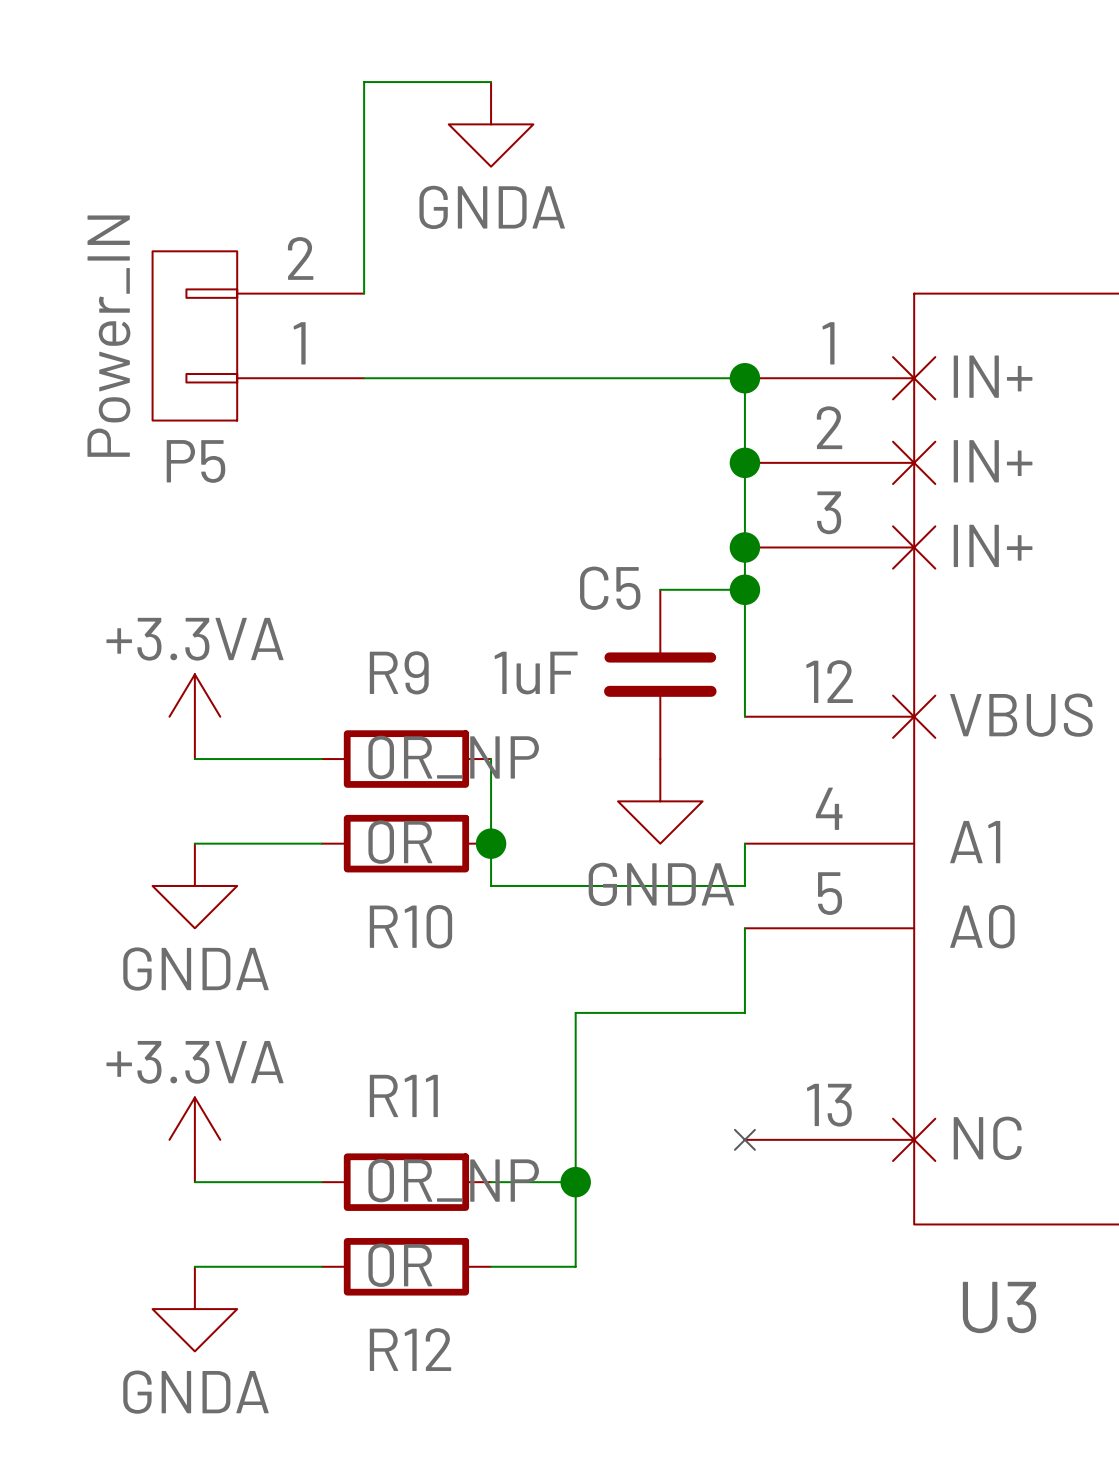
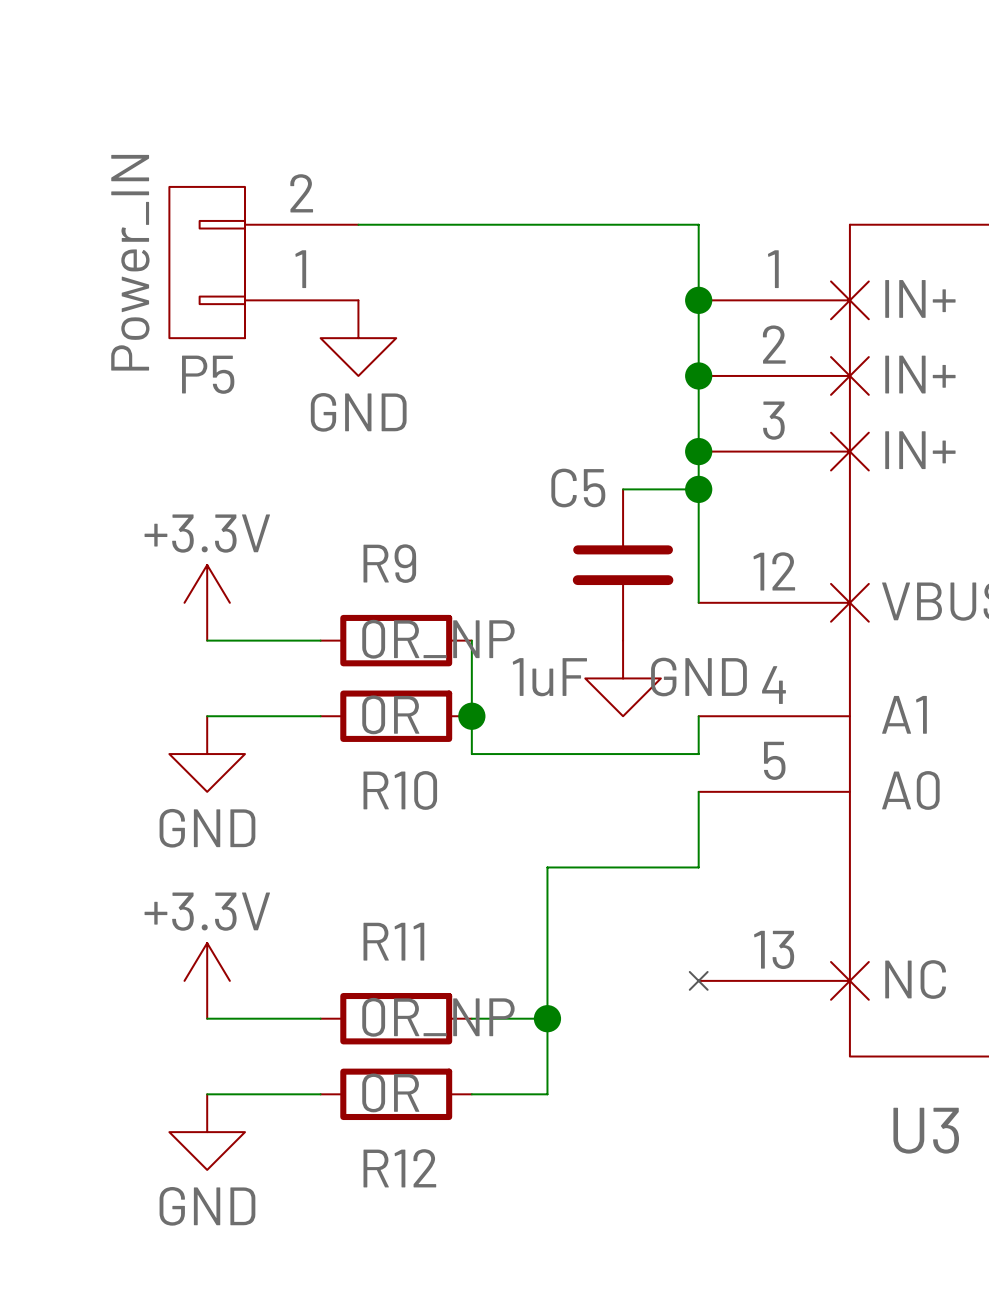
wire: (491, 82) (364, 82) (364, 293) -> none
power symbol: GNDA (491, 124) -> none
wire: (364, 378) (744, 378) -> (358, 224) (698, 224) (698, 300)
power symbol: none -> GND (358, 338)
C5 value position: 1uF (536, 673) -> 1uF (549, 677)
power symbol: +3.3VA (194, 716) -> +3.3V (207, 602)
power symbol: GNDA (660, 801) -> GND (623, 678)
power symbol: GNDA (194, 885) -> GND (207, 754)
power symbol: +3.3VA (194, 1139) -> +3.3V (207, 980)
power symbol: GNDA (194, 1309) -> GND (207, 1132)

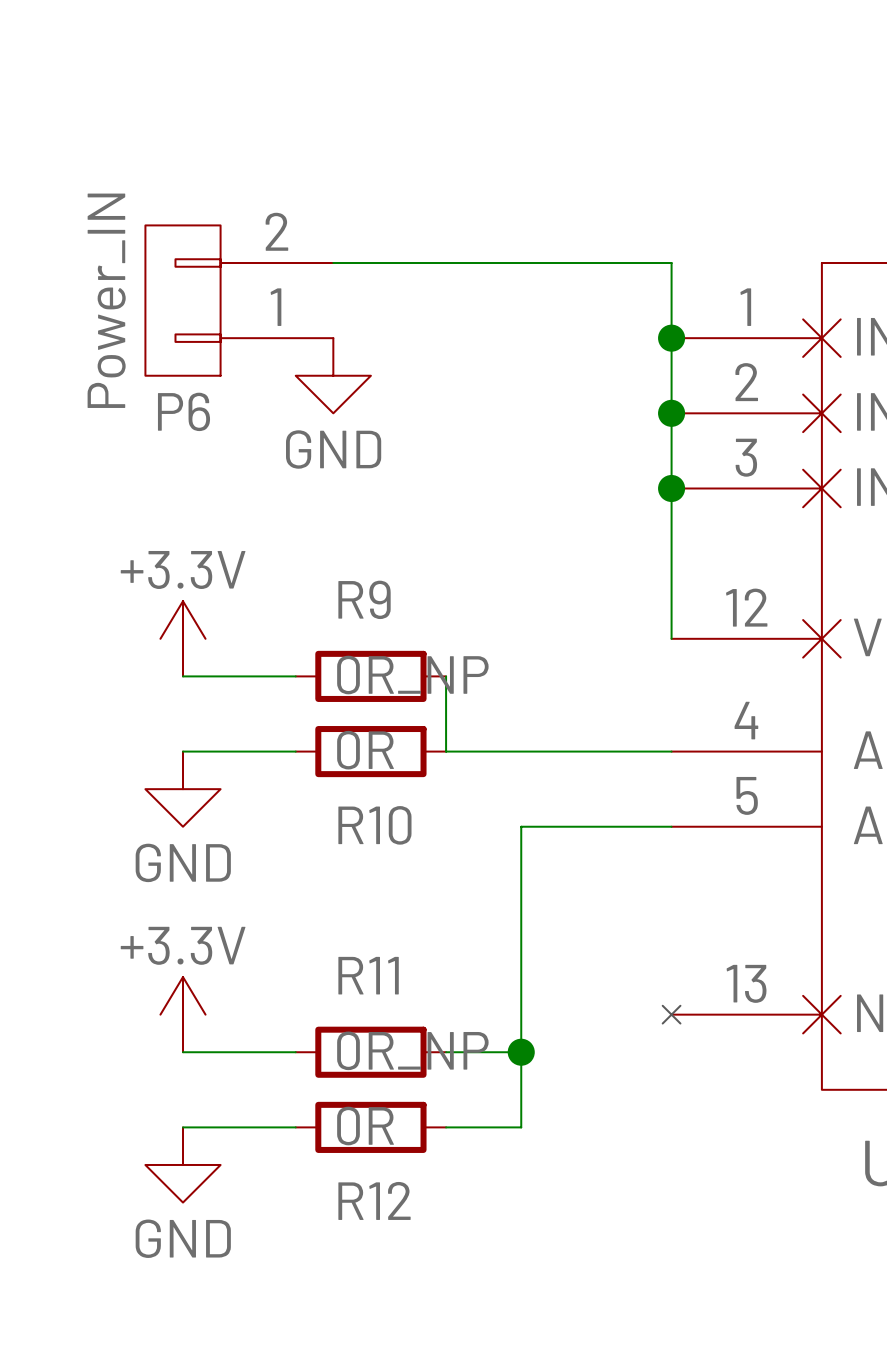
P5 name: P5 (208, 374) -> P6 (183, 411)
wire: (623, 489) (698, 489) -> none
junction: (698, 489) -> none
C5: 1uF (623, 565) -> none
power symbol: GND (623, 678) -> none
wire: (471, 716) (471, 754) (698, 754) (698, 716) -> (446, 751) (671, 751)
junction: (471, 716) -> none
wire: (698, 791) (698, 867) (547, 867) -> (671, 826) (521, 826) (521, 901)

